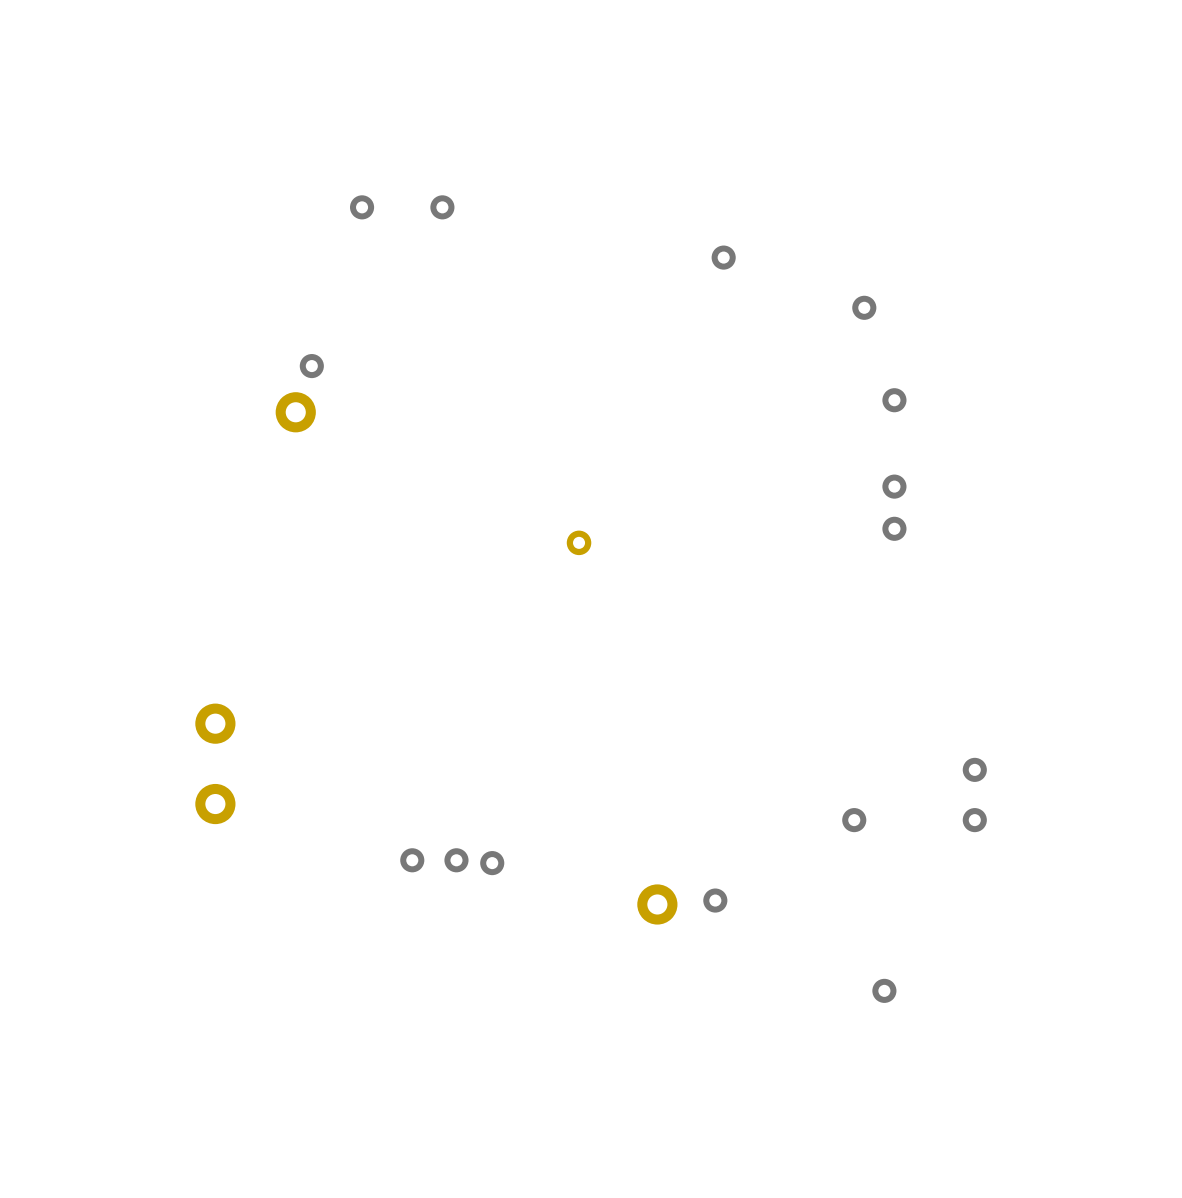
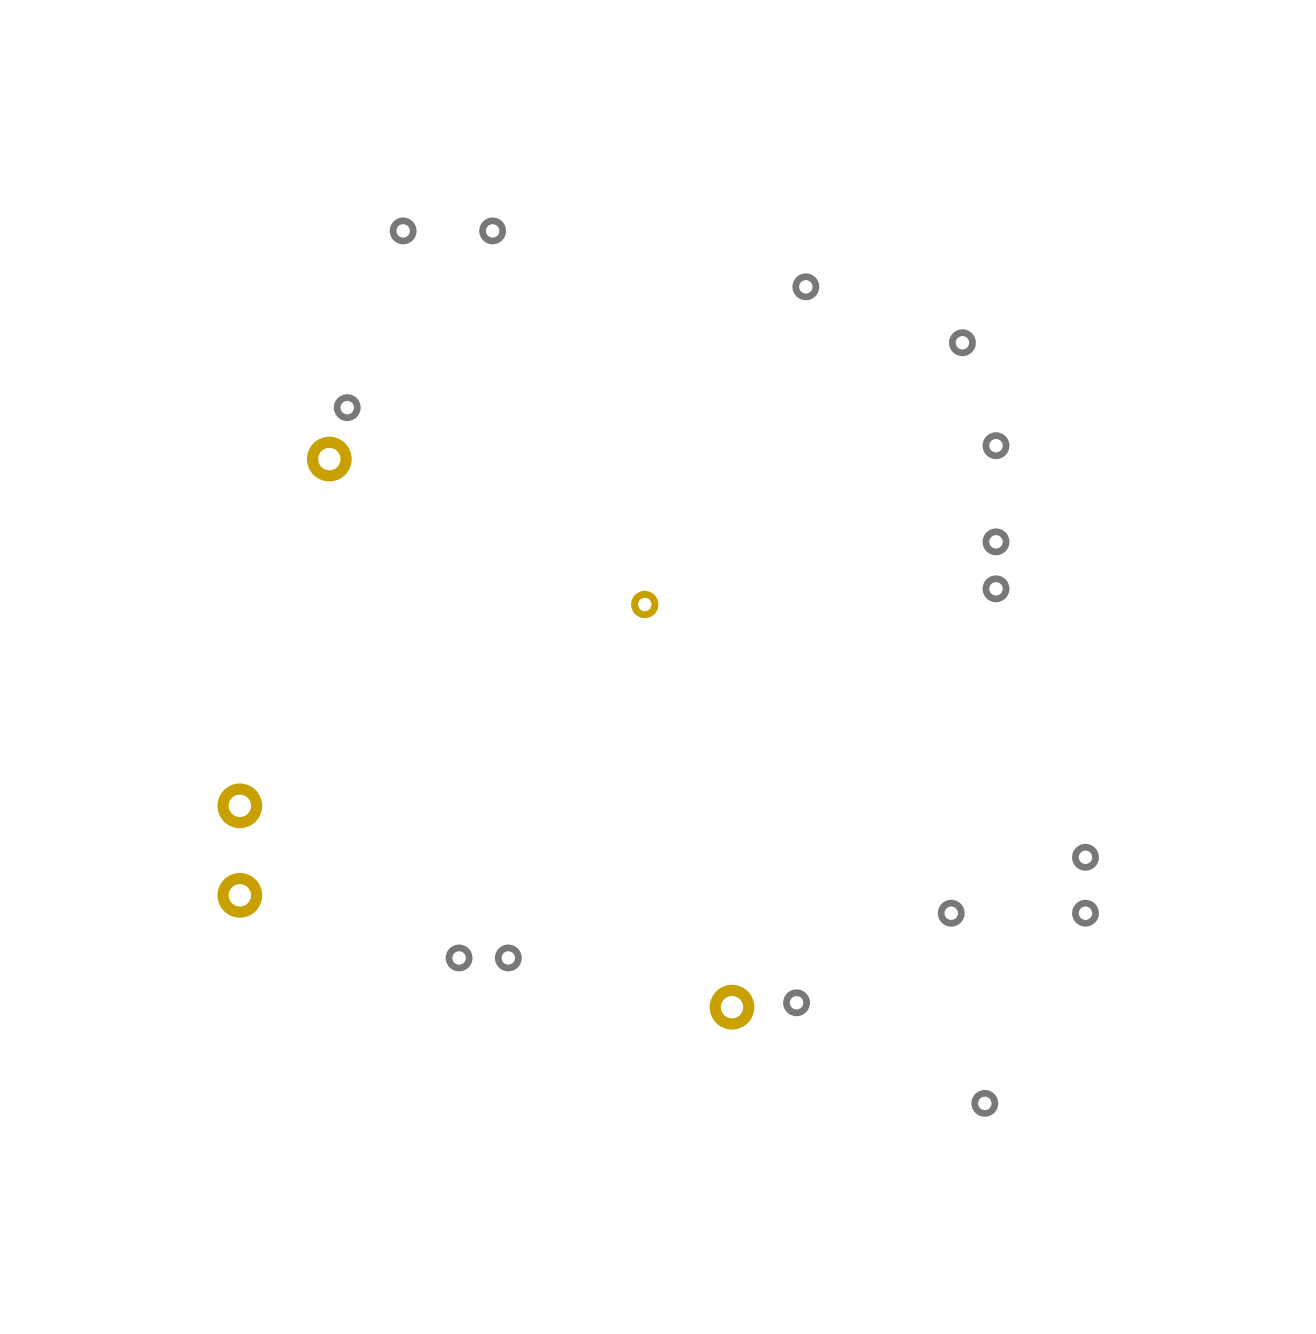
via: (492, 863) -> none

